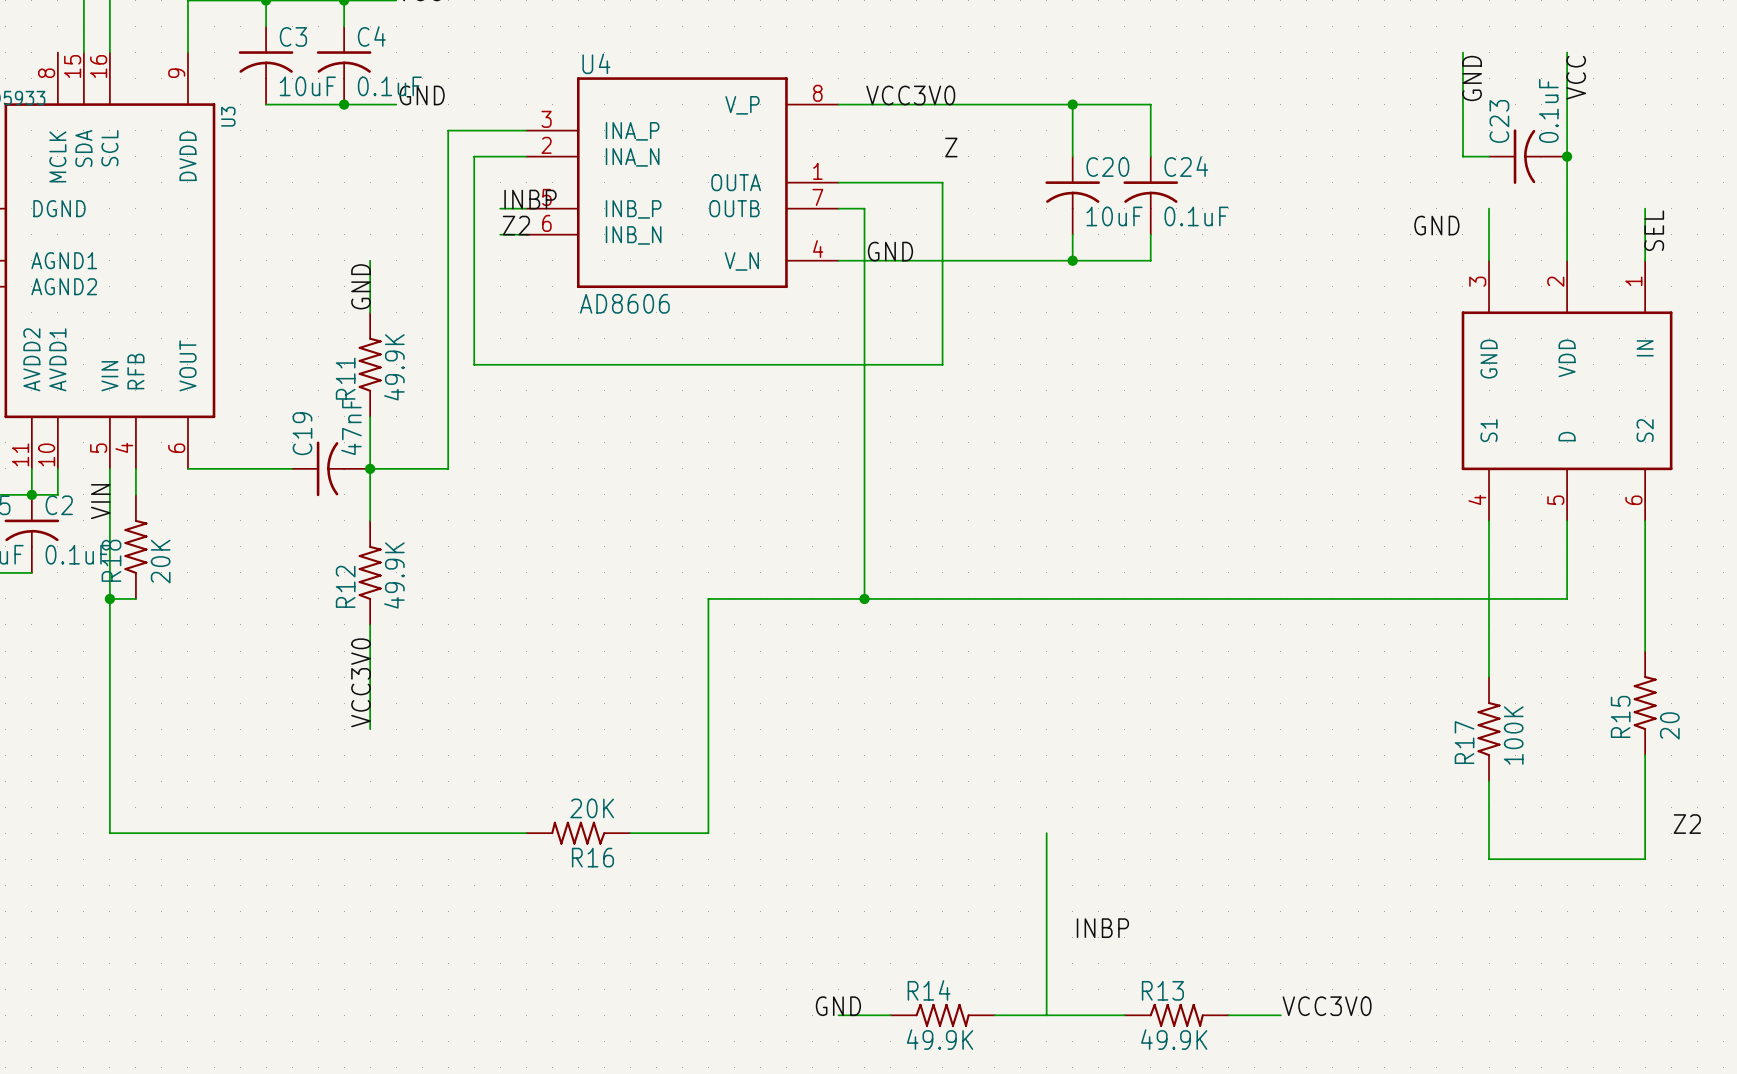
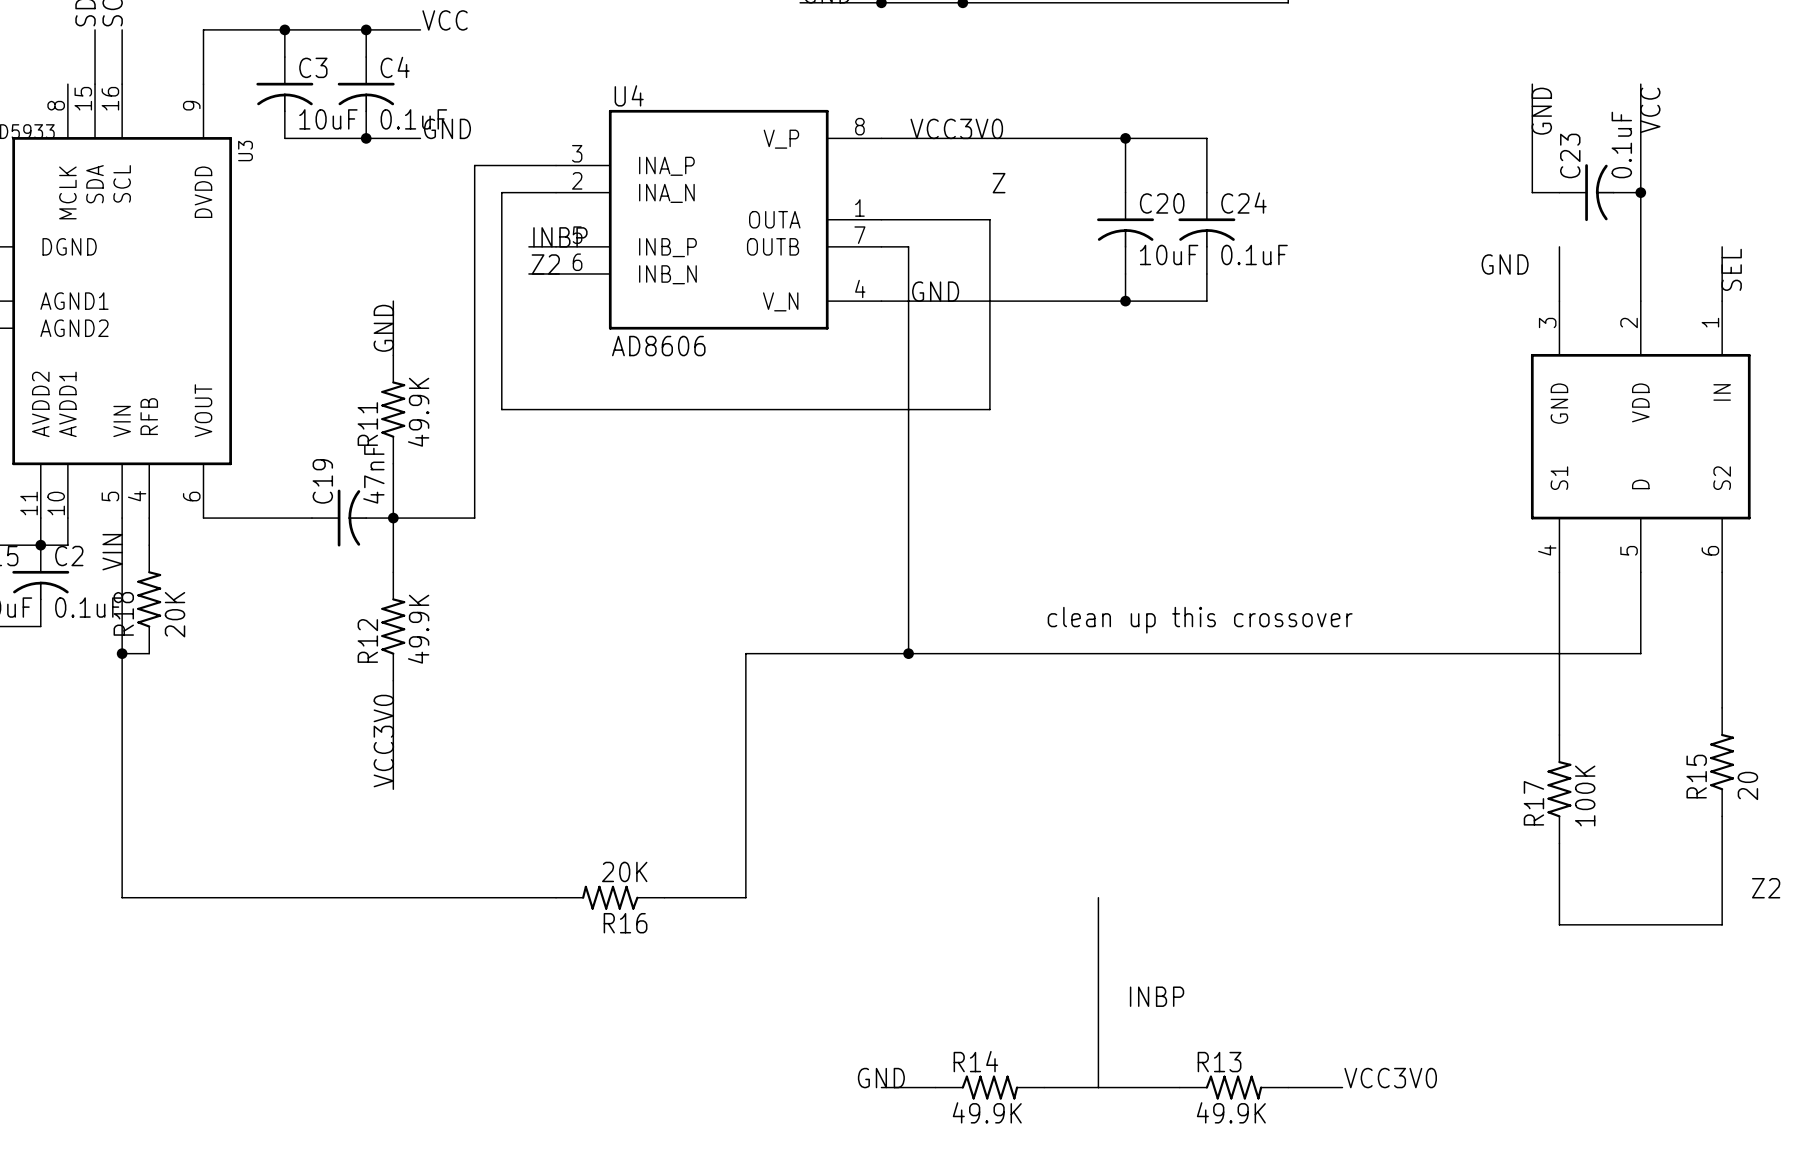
text: none -> clean up this crossover (1200, 620)

